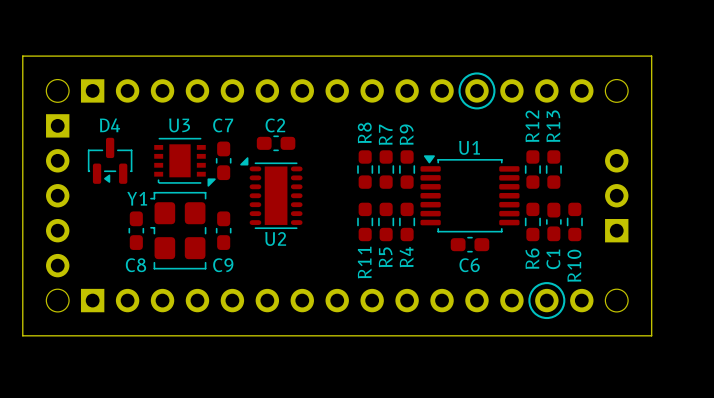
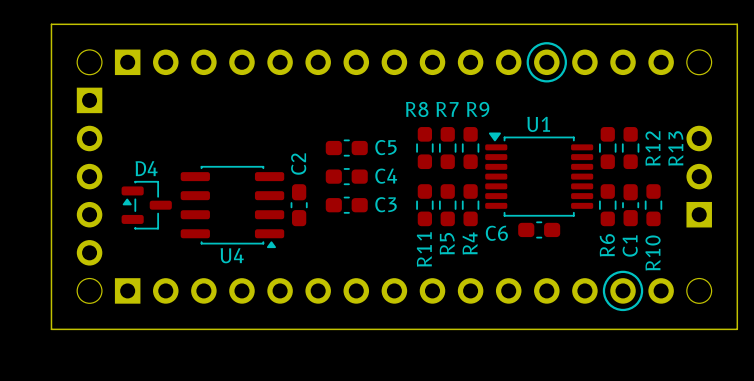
R12 name position: R12 (532, 126) -> R12 (652, 148)
R13 name position: R13 (553, 126) -> R13 (675, 148)
R8 name rotation: 0° (364, 132) -> 90° clockwise (417, 109)
R7 name rotation: 0° (385, 134) -> 90° clockwise (447, 109)
R9 name rotation: 0° (406, 134) -> 90° clockwise (478, 109)
C2 rotation: 0° (276, 143) -> 90° clockwise (299, 205)
C2 position: (276, 143) -> (299, 205)
D4 rotation: 0° (110, 160) -> 90° clockwise (146, 205)
D4 position: (110, 160) -> (146, 205)
C7: (223, 160) -> none
U3: (184, 162) -> none
C5: none -> (346, 148)
U2: (271, 193) -> none
C4: none -> (346, 176)
C3: none -> (346, 205)
U4: none -> (232, 206)
C8: (136, 230) -> none
Y1: (178, 230) -> none
C9: (223, 230) -> none
C6 name position: C6 (469, 265) -> C6 (496, 233)

